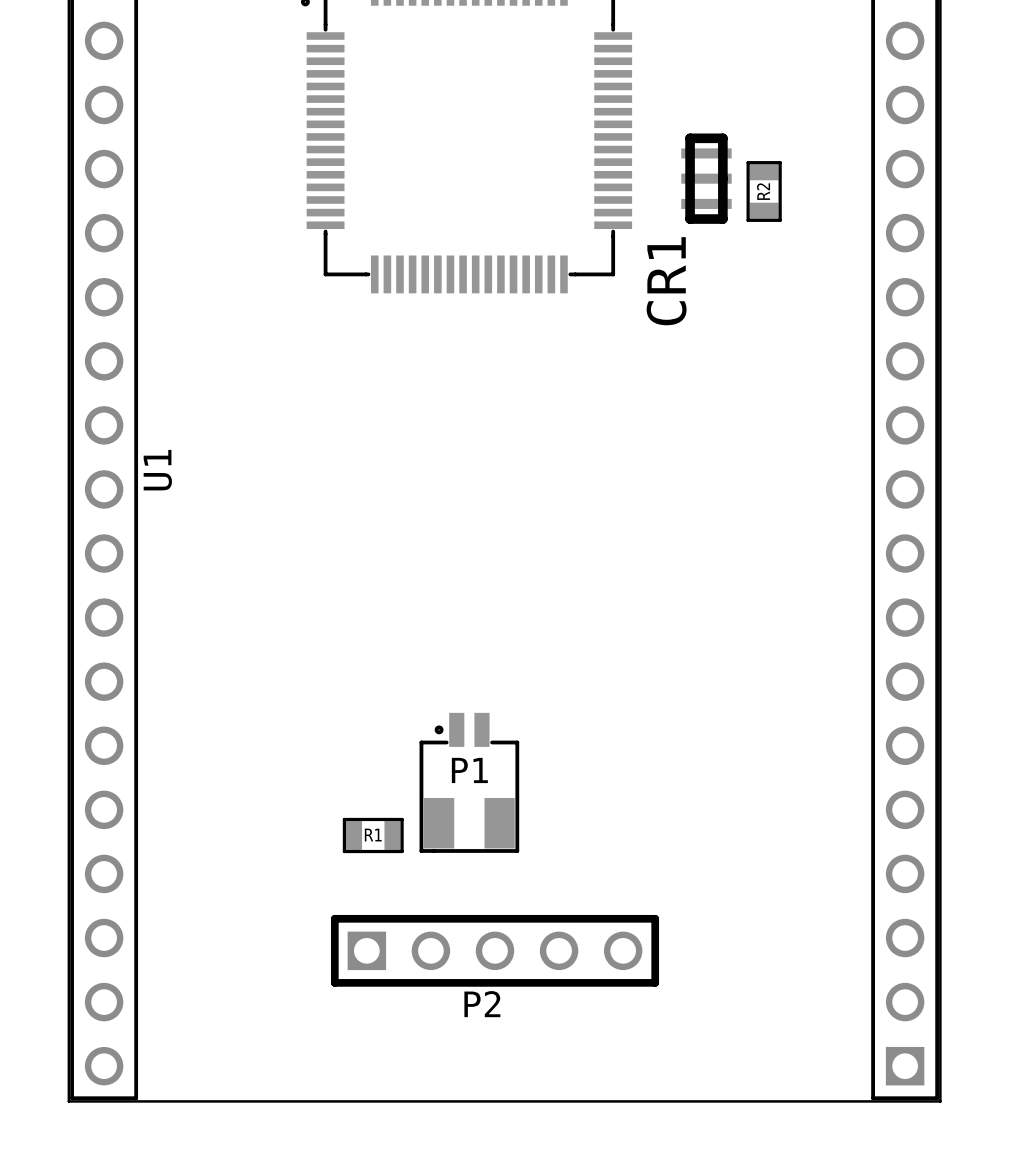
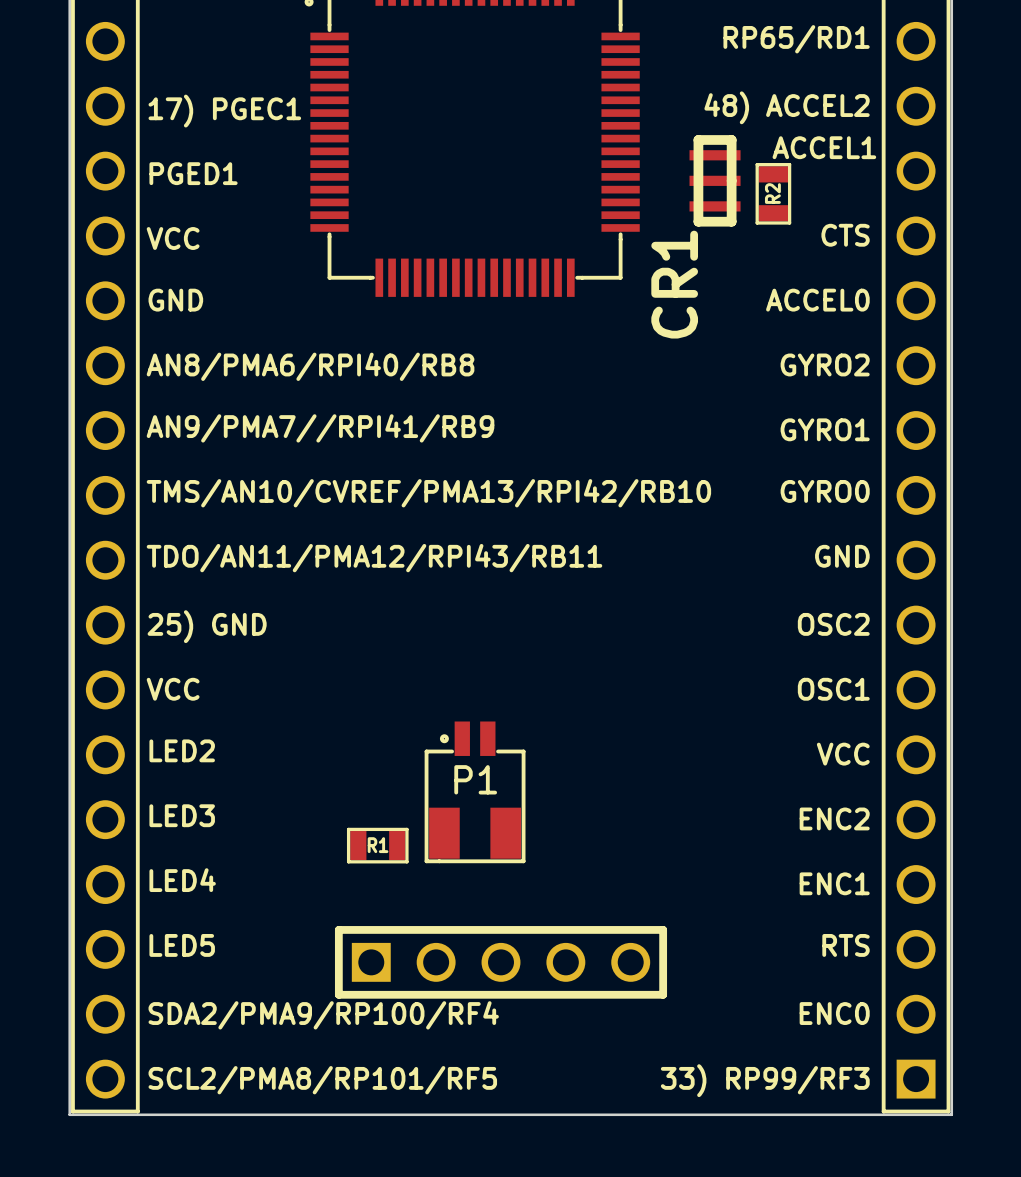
text: none -> RP65/RD1 (796, 39)
text: none -> 48) ACCEL2 (787, 107)
text: none -> 17) PGEC1 (224, 111)
text: none -> ACCEL1 (824, 147)
text: none -> PGED1 (193, 173)
text: none -> CTS (845, 235)
text: none -> VCC (173, 238)
text: none -> GND (175, 300)
text: none -> ACCEL0 (817, 300)
text: none -> GYRO2 (825, 364)
text: none -> AN8/PMA6/RPI40/RB8 (310, 366)
text: none -> AN9/PMA7//RPI41/RB9 (320, 428)
text: none -> GYRO1 (825, 429)
U1 name: U1 (157, 470) -> none
text: none -> GYRO0 (825, 491)
text: none -> TMS/AN10/CVREF/PMA13/RPI42/RB10 (428, 493)
text: none -> GND (842, 556)
text: none -> TDO/AN11/PMA12/RPI43/RB11 (374, 558)
text: none -> OSC2 (833, 624)
text: none -> 25) GND (207, 626)
text: none -> VCC (173, 689)
text: none -> OSC1 (833, 689)
text: none -> LED2 (182, 750)
text: none -> VCC (843, 754)
text: none -> LED3 (182, 815)
text: none -> ENC2 (834, 818)
text: none -> LED4 (182, 880)
text: none -> ENC1 (834, 883)
text: none -> LED5 (182, 945)
text: none -> RTS (846, 945)
text: none -> ENC0 (834, 1013)
text: none -> SDA2/PMA9/RP100/RF4 (323, 1015)
P2 name: P2 (482, 1004) -> none
text: none -> SCL2/PMA8/RP101/RF5 (322, 1080)
text: none -> 33) RP99/RF3 (765, 1080)

